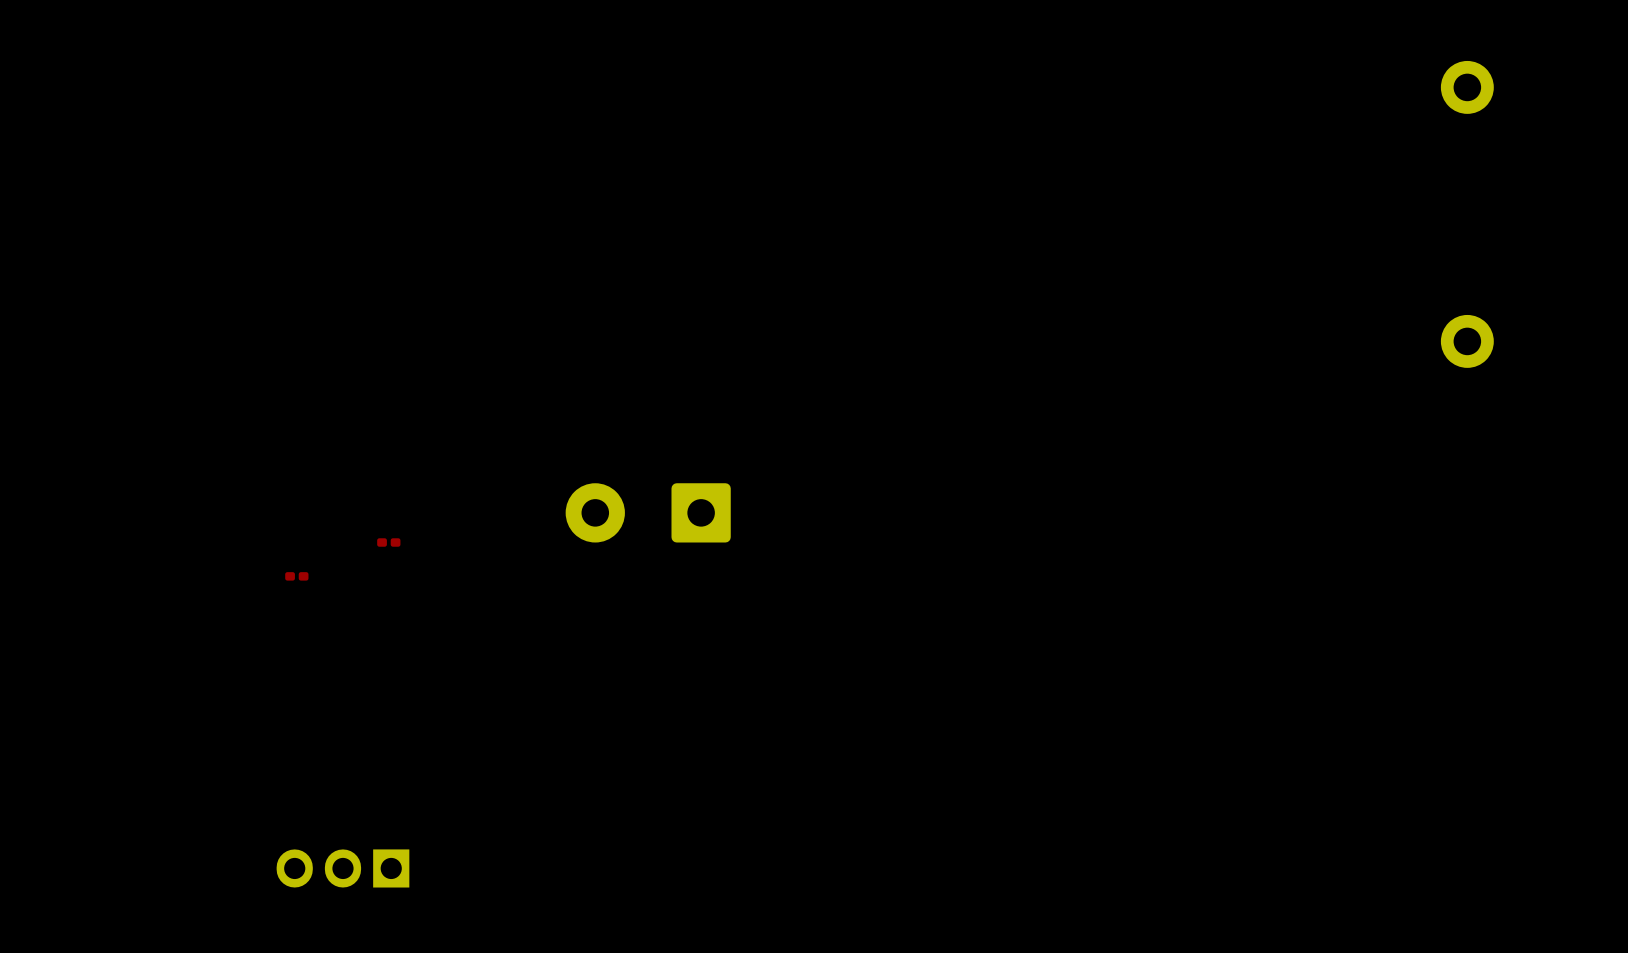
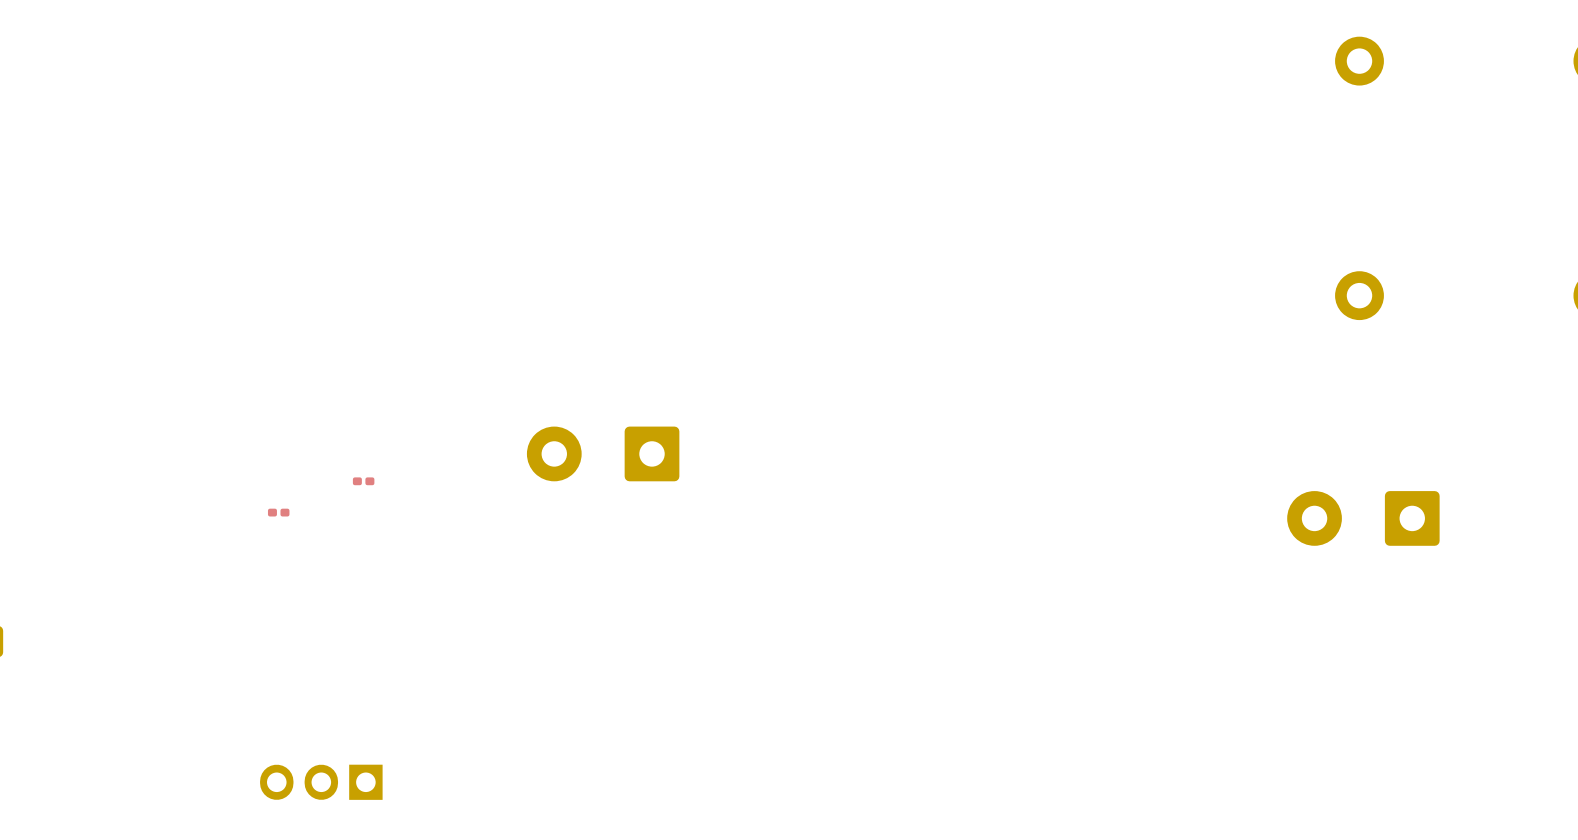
part: none -> (1363, 518)

